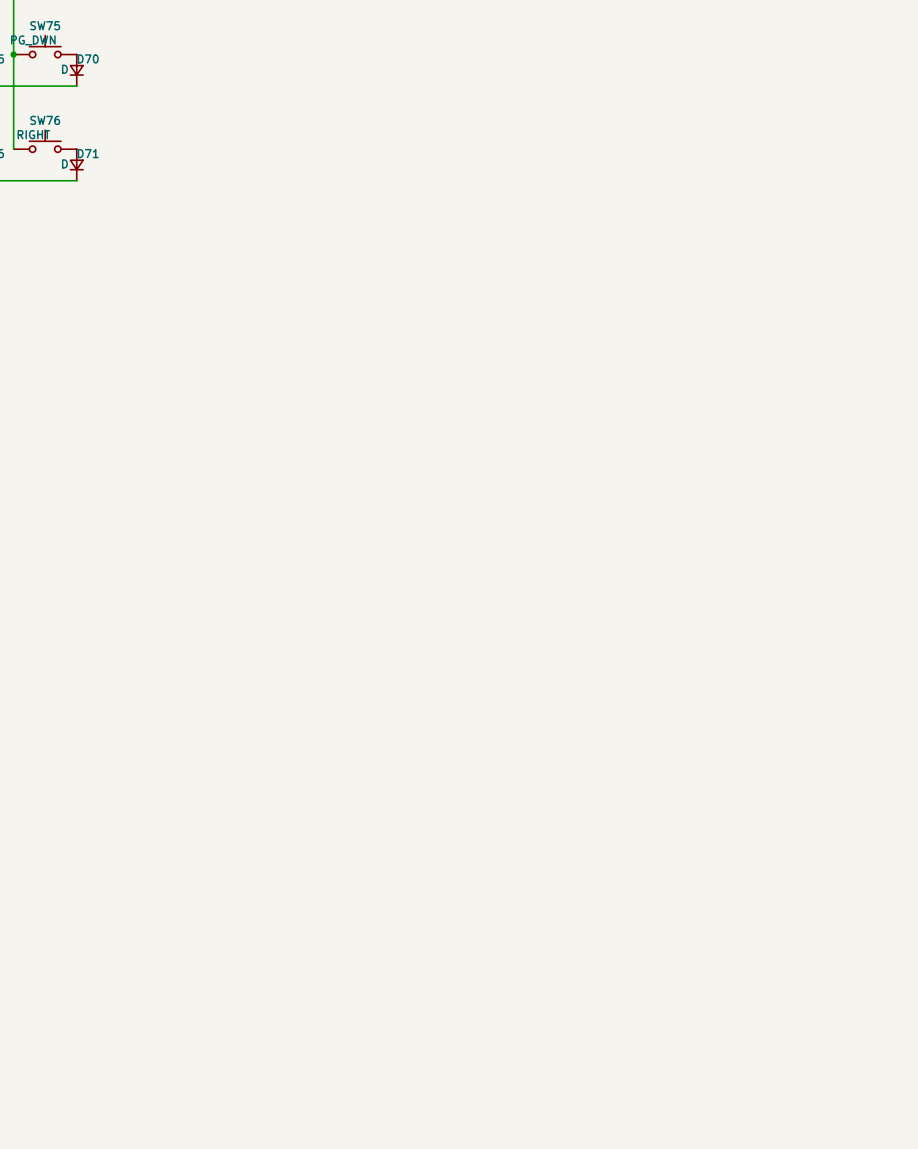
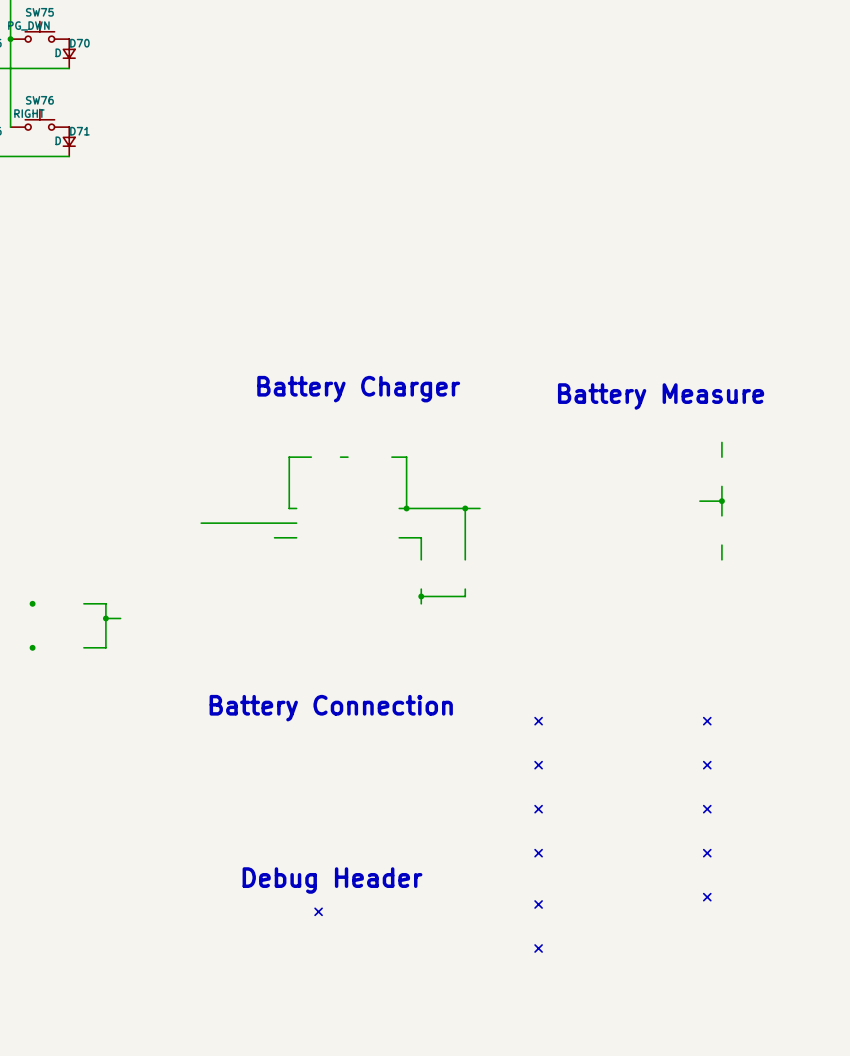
text: none -> Battery Charger (358, 389)
text: none -> Battery Measure (661, 396)
wire: none -> (721, 442) (721, 457)
wire: none -> (311, 457) (289, 457) (289, 508) (296, 508)
wire: none -> (340, 457) (347, 457)
wire: none -> (391, 457) (406, 457) (406, 508)
wire: none -> (721, 486) (721, 515)
wire: none -> (699, 501) (721, 501)
junction: none -> (721, 501)
wire: none -> (399, 508) (479, 508)
junction: none -> (406, 508)
wire: none -> (465, 508) (465, 559)
junction: none -> (465, 508)
wire: none -> (201, 523) (296, 523)
wire: none -> (274, 537) (296, 537)
wire: none -> (399, 537) (421, 537) (421, 559)
wire: none -> (721, 545) (721, 559)
wire: none -> (421, 589) (421, 603)
wire: none -> (465, 589) (465, 596) (421, 596)
junction: none -> (421, 596)
junction: none -> (32, 603)
wire: none -> (83, 603) (105, 603) (105, 647) (83, 647)
wire: none -> (105, 618) (120, 618)
junction: none -> (105, 618)
junction: none -> (32, 647)
text: none -> Battery Connection (331, 708)
no-connect mark: none -> (538, 721)
no-connect mark: none -> (707, 721)
no-connect mark: none -> (538, 765)
no-connect mark: none -> (707, 765)
no-connect mark: none -> (538, 809)
no-connect mark: none -> (707, 809)
no-connect mark: none -> (538, 853)
no-connect mark: none -> (707, 853)
text: none -> Debug Header (332, 880)
no-connect mark: none -> (707, 897)
no-connect mark: none -> (538, 904)
no-connect mark: none -> (318, 911)
no-connect mark: none -> (538, 948)

